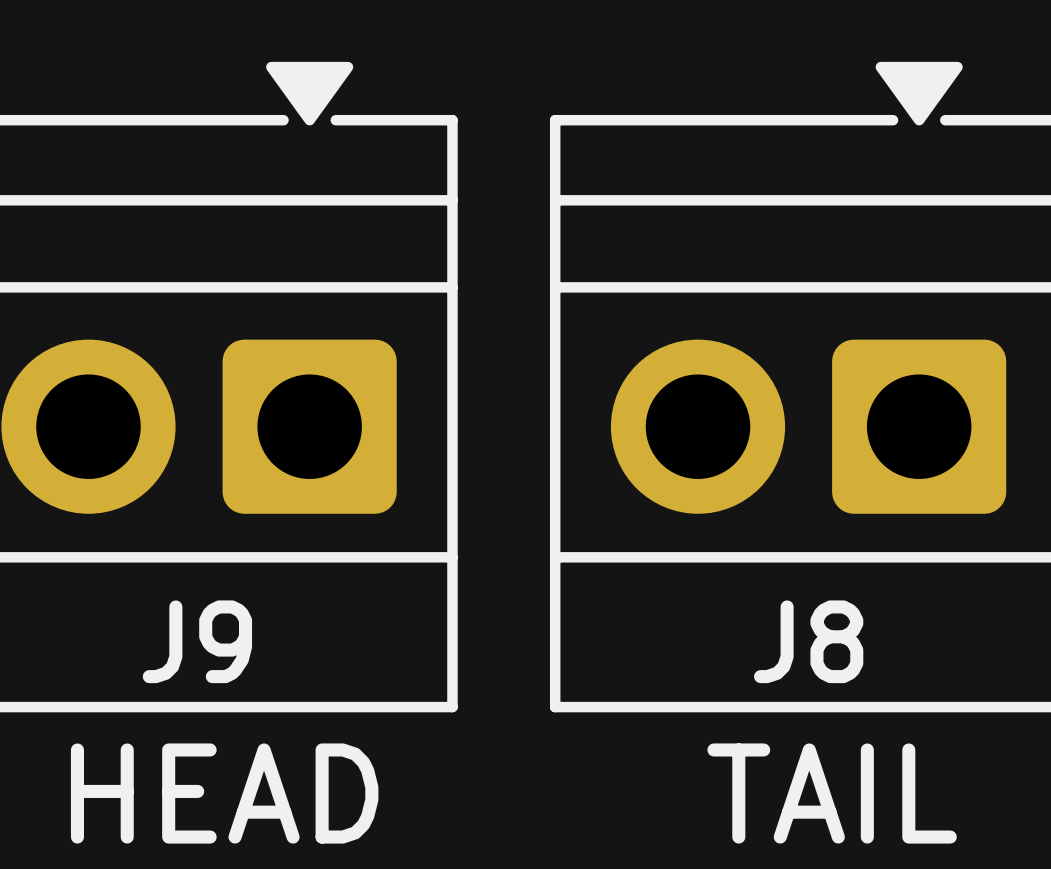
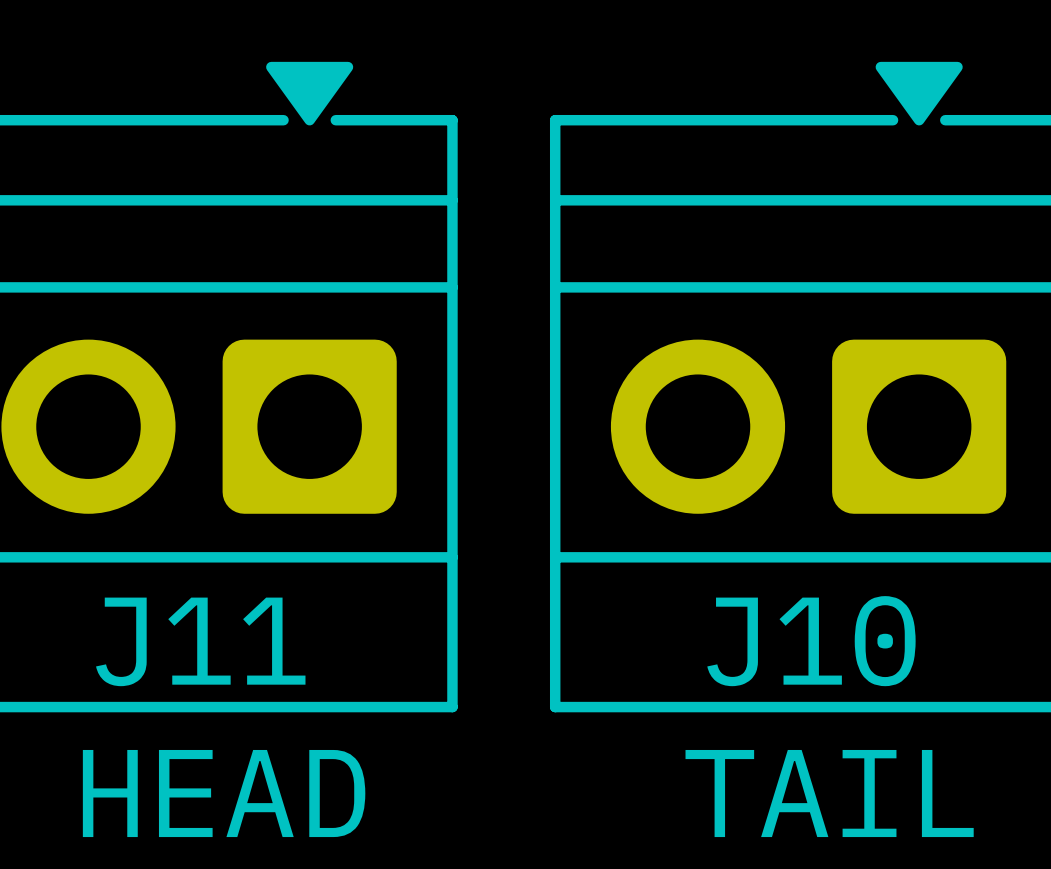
J9 name: J9 (197, 641) -> J11 (200, 641)
J8 name: J8 (808, 641) -> J10 (811, 641)

